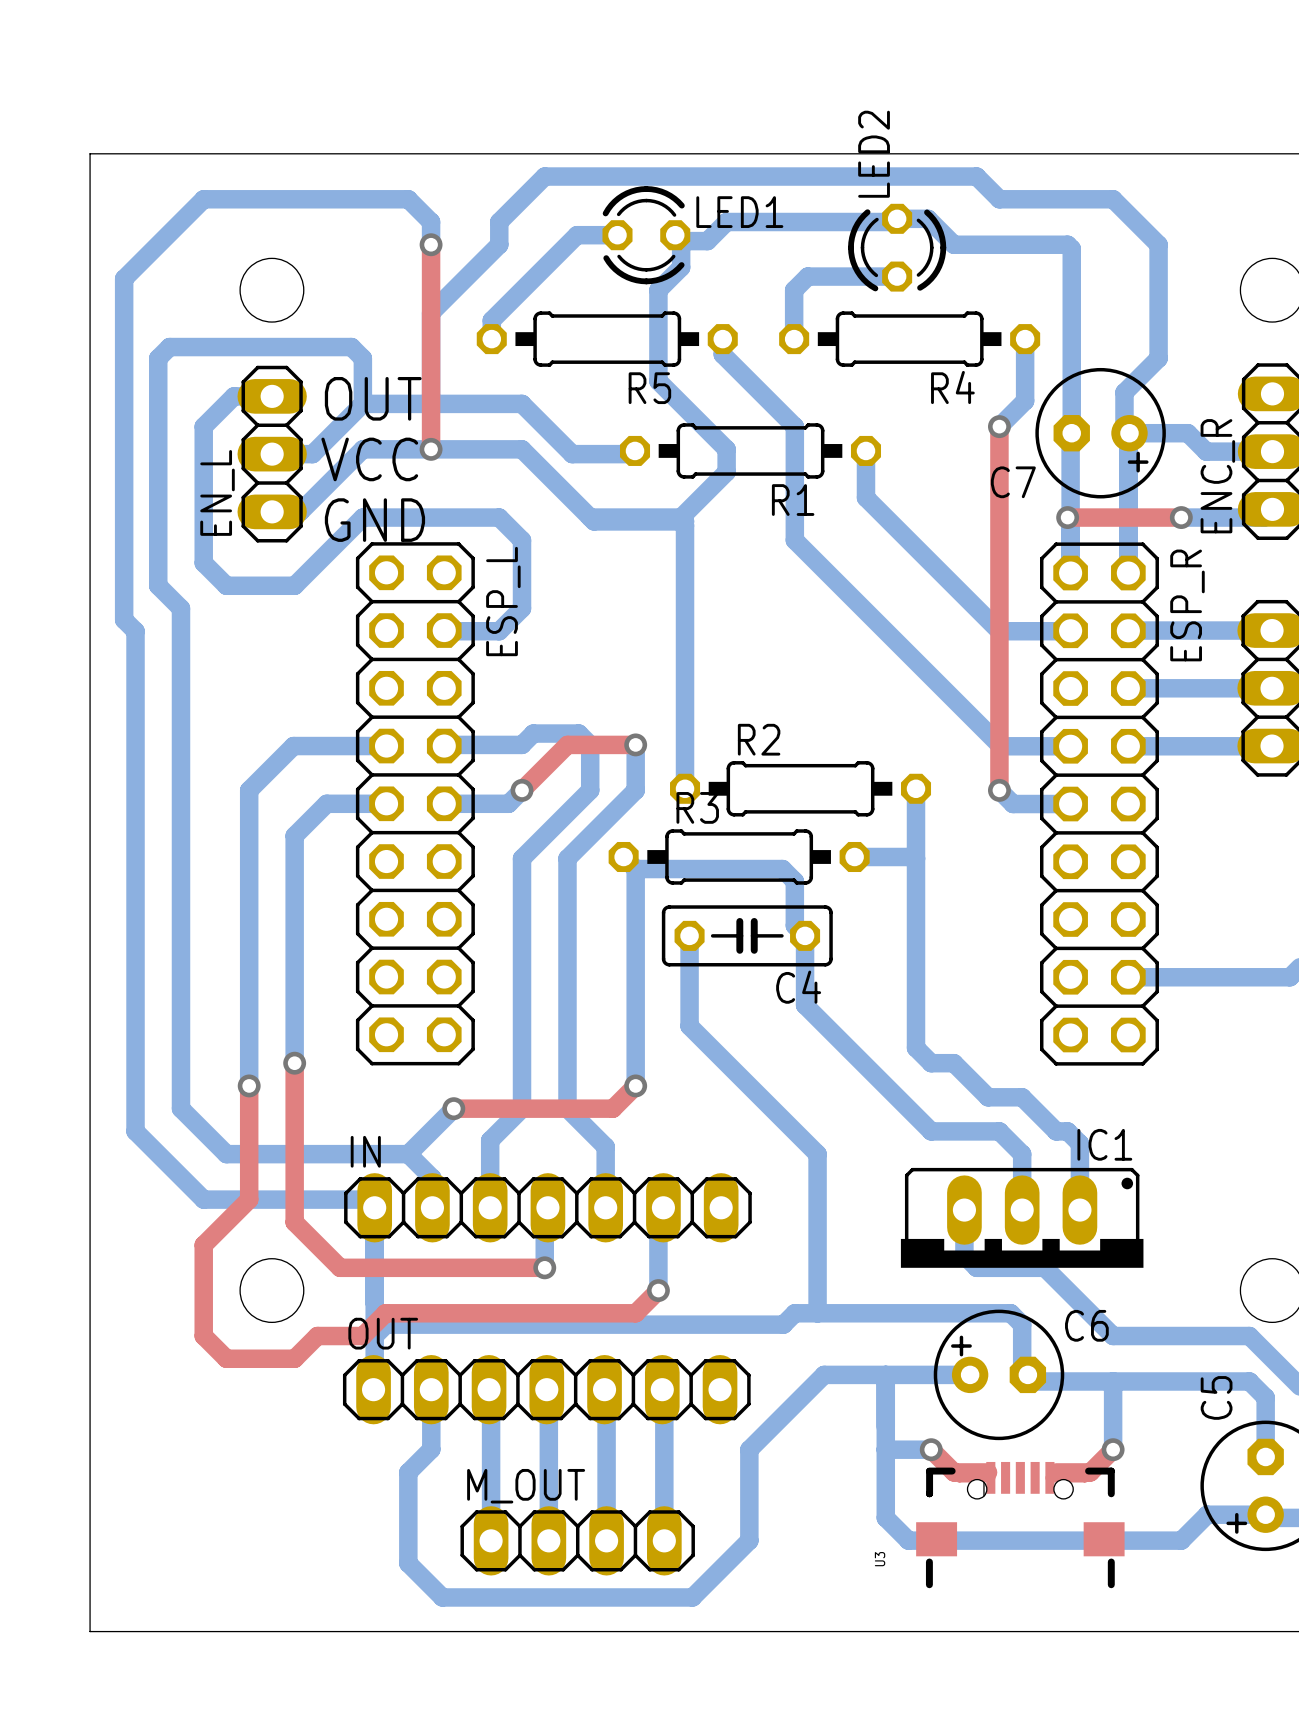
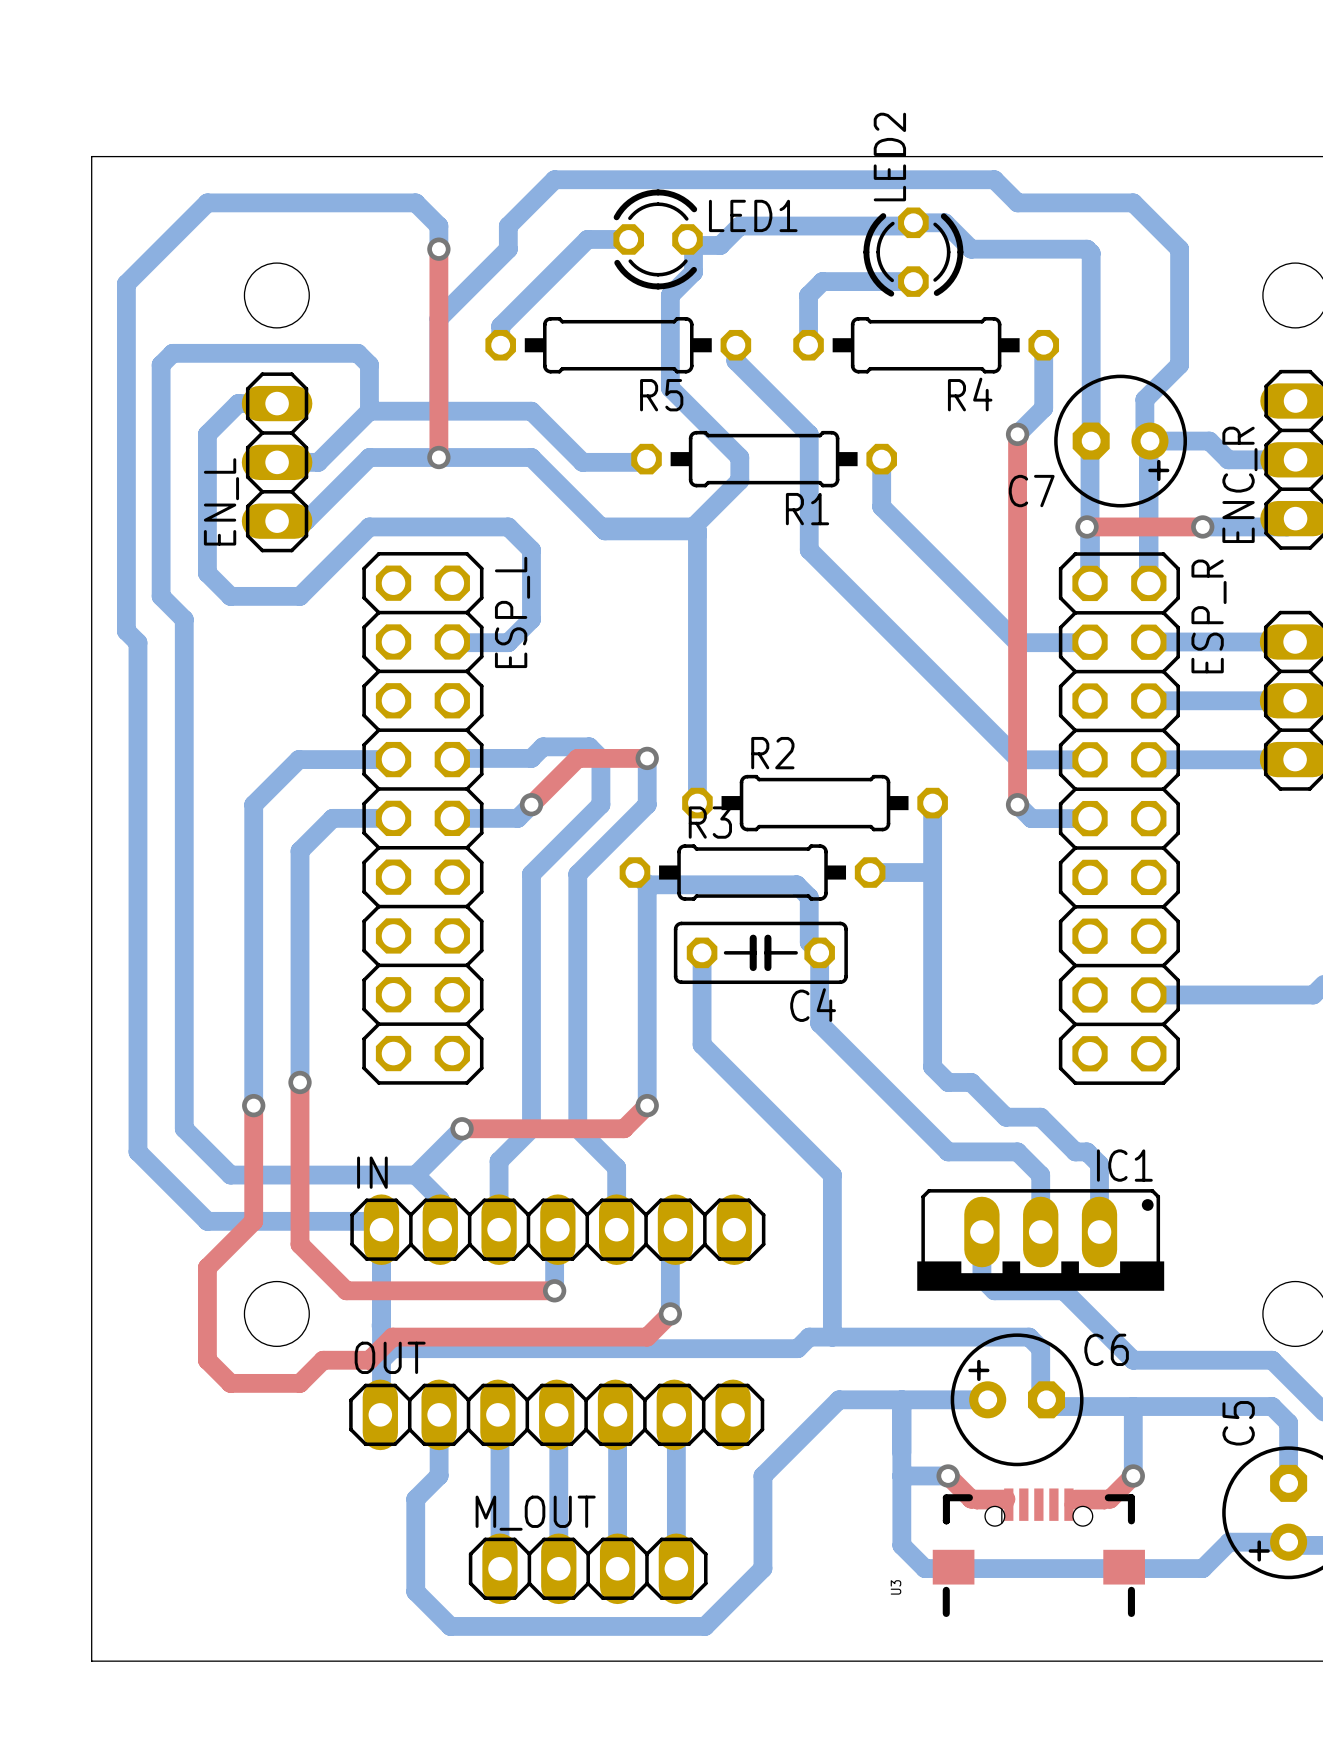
text: OUT (373, 398) -> none
text: VCC (369, 459) -> none
text: GND (374, 520) -> none

